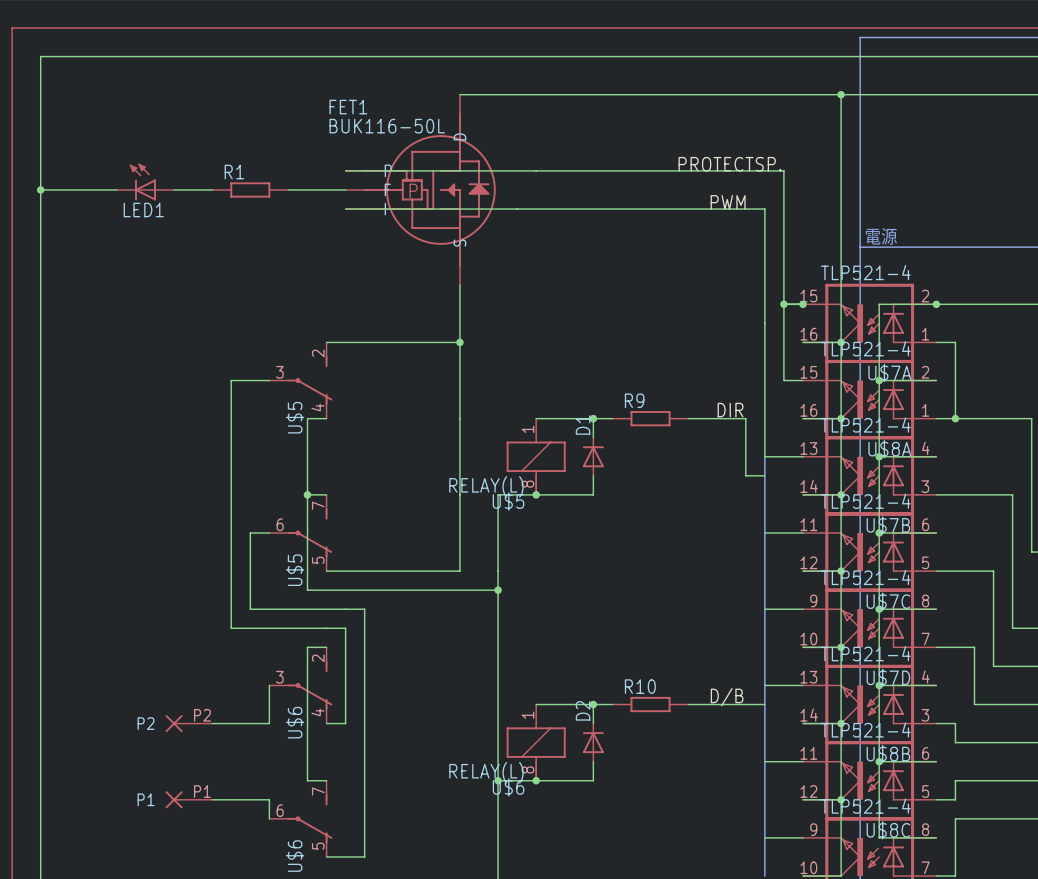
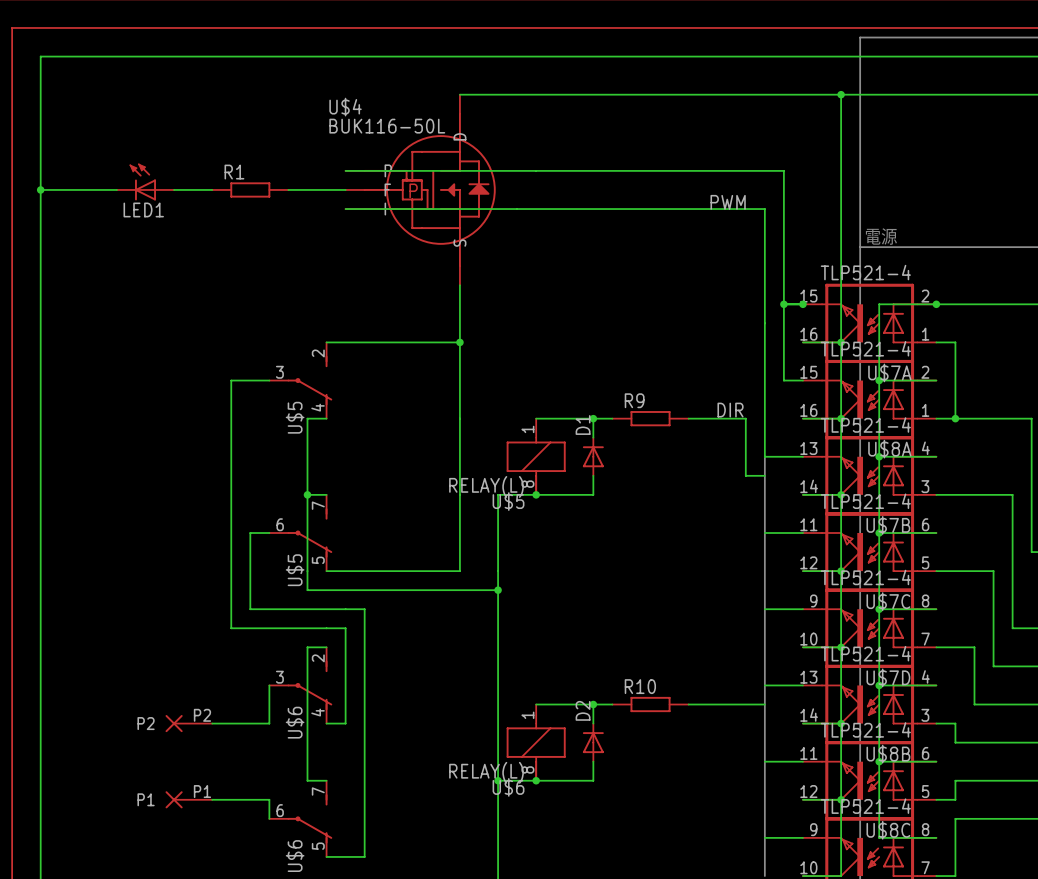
FET1 name: FET1 (348, 107) -> U$4 (345, 107)
label: PROTECTSP. (730, 164) -> none
label: D/B (727, 697) -> none

